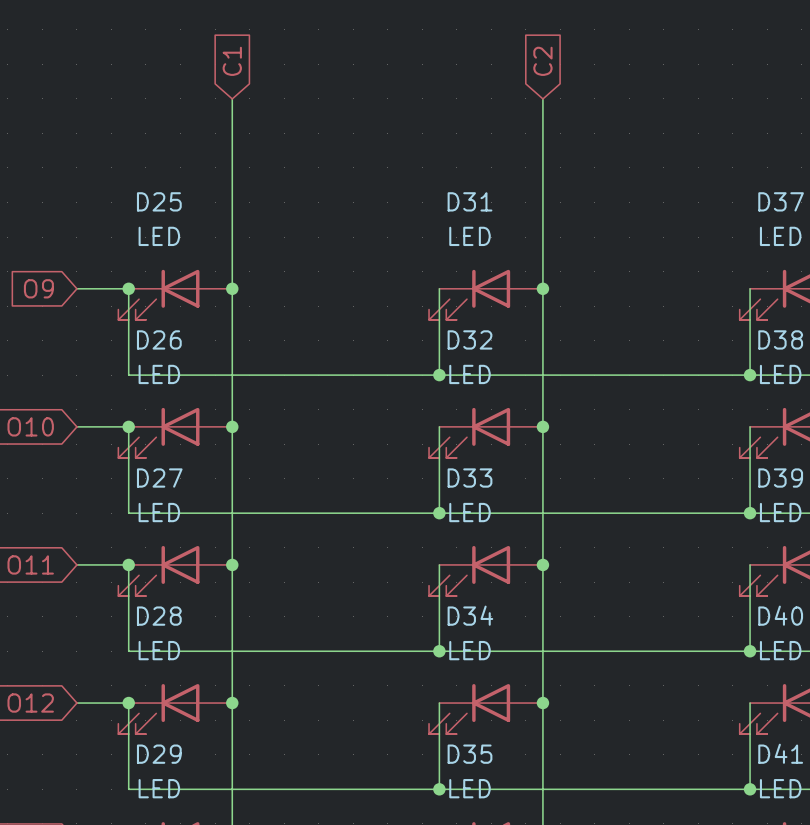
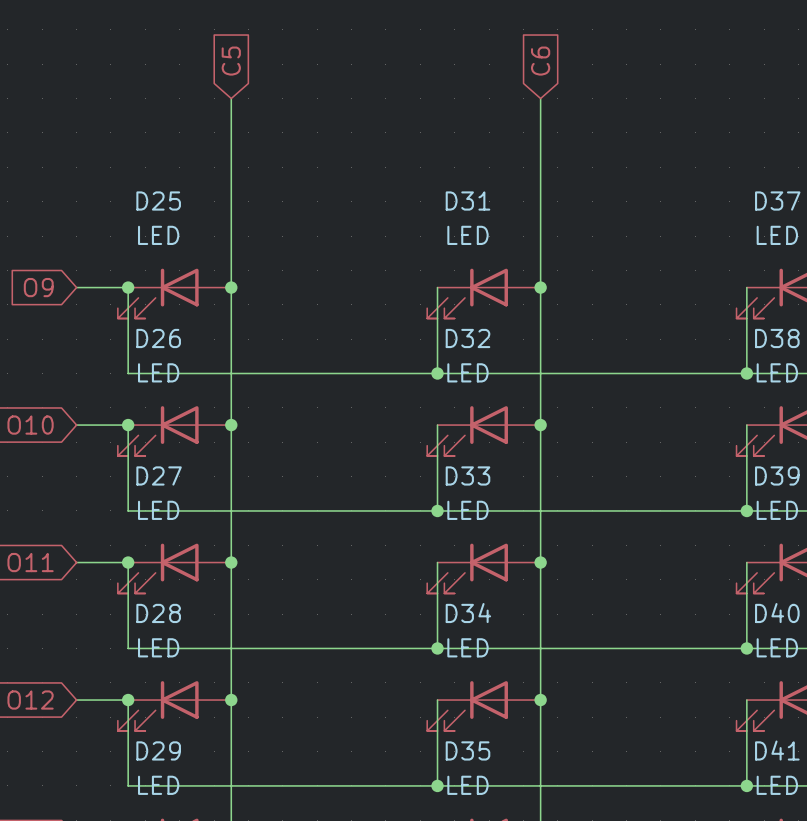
global label: C1 (232, 61) -> C5 (231, 61)
global label: C2 (542, 61) -> C6 (540, 61)

